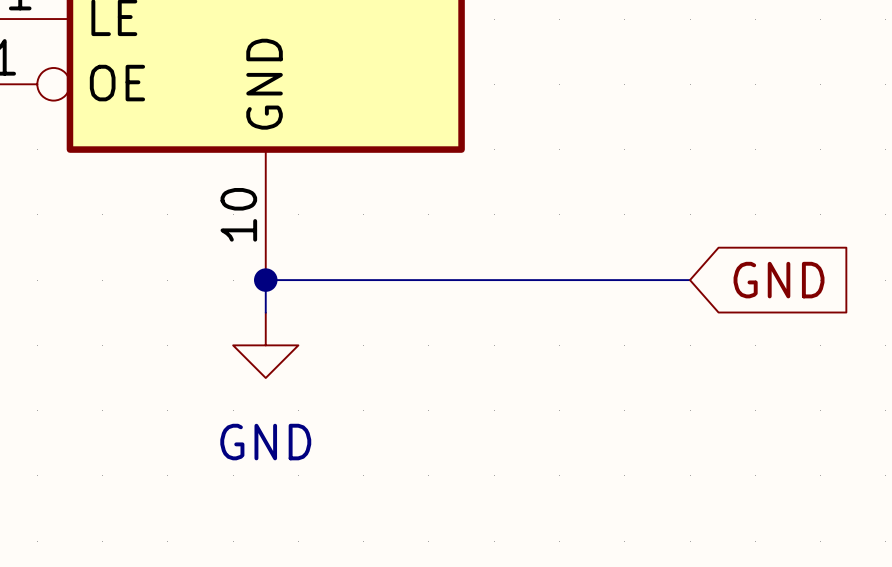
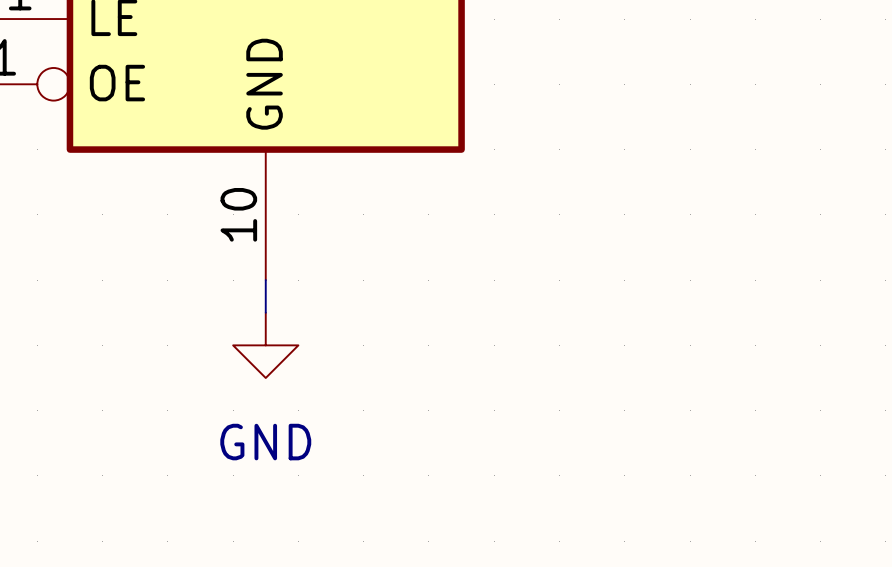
wire: (265, 280) (690, 280) -> none
junction: (265, 280) -> none
global label: GND (779, 280) -> none

